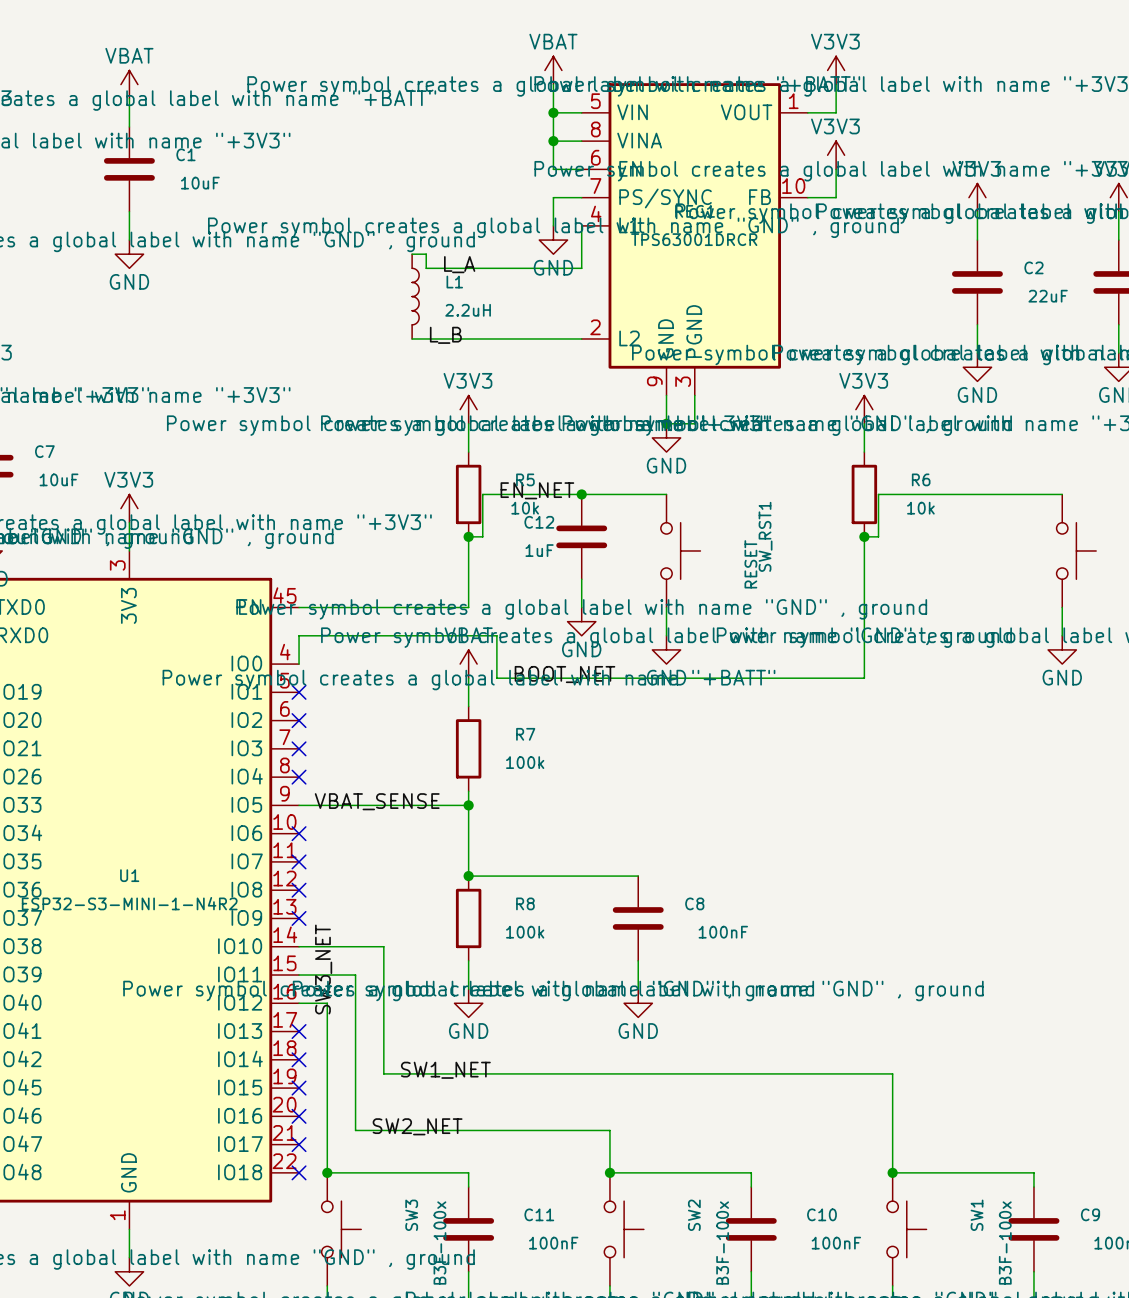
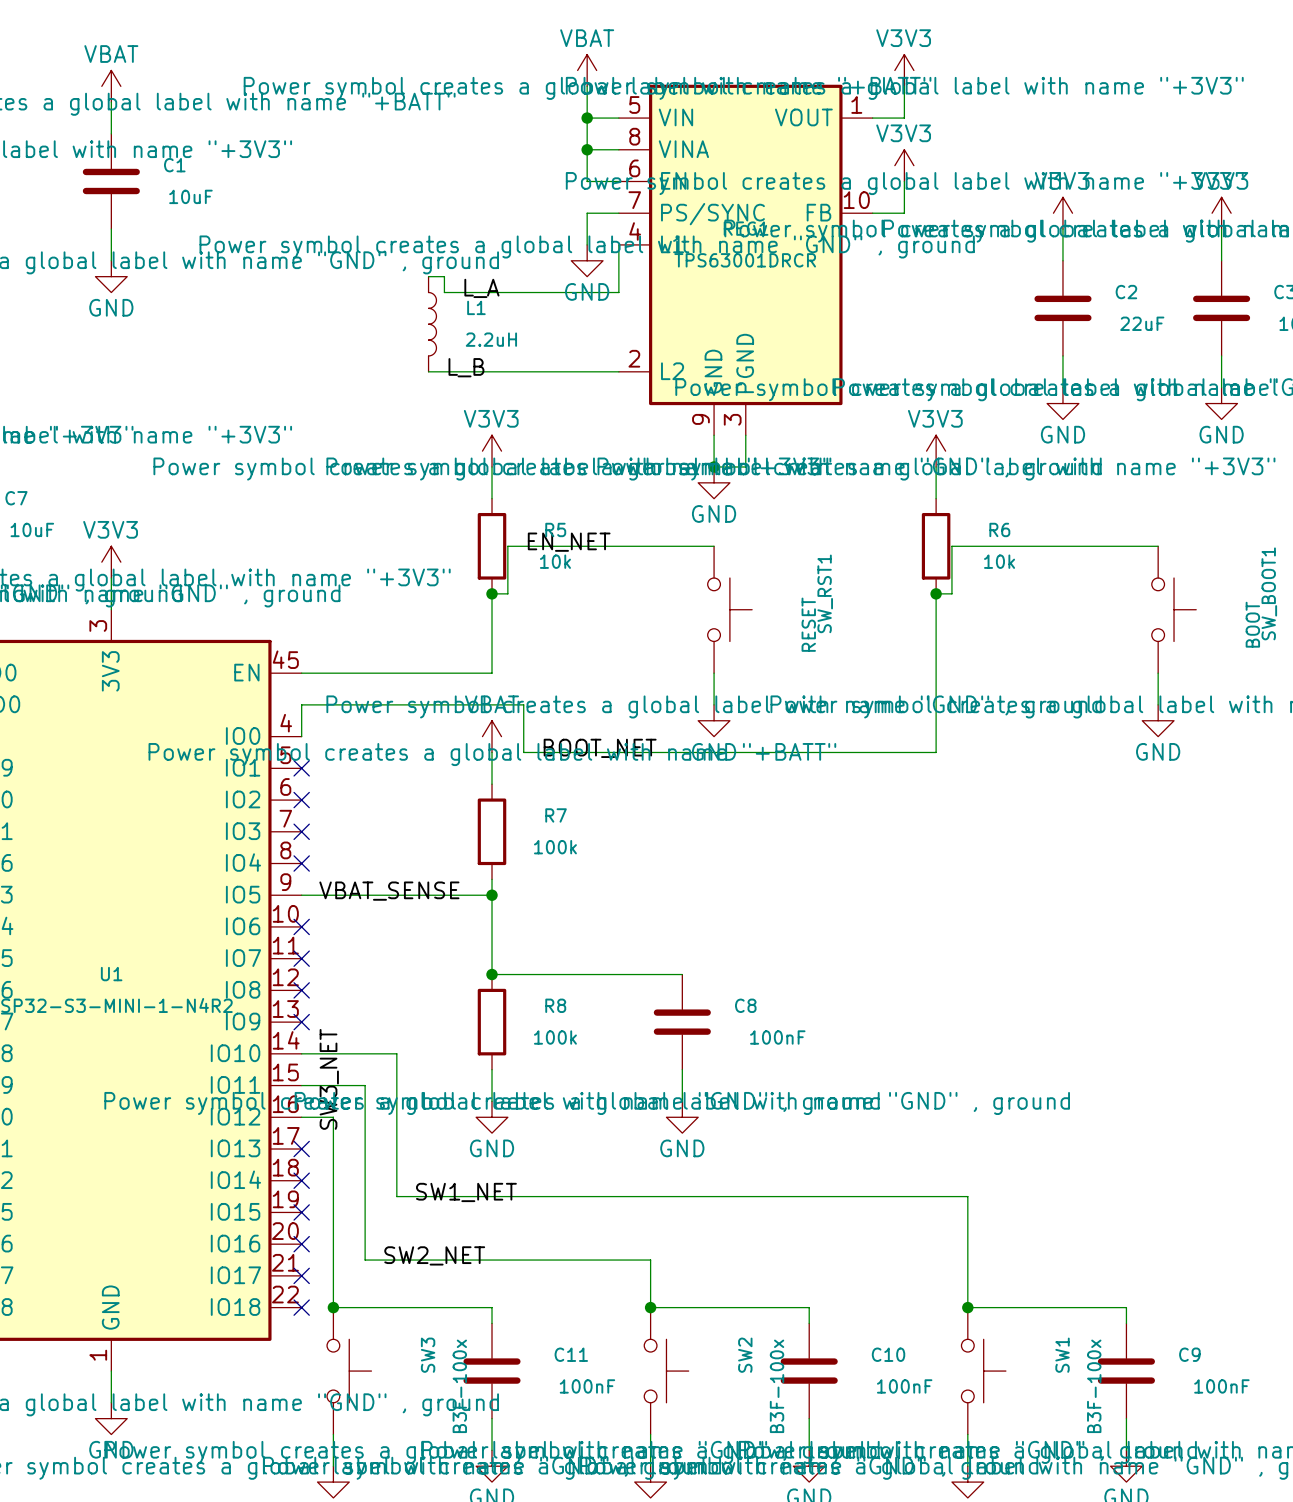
junction: (581, 494) -> none
C12: 1uF (581, 536) -> none
wire: (581, 579) (581, 607) -> none
power symbol: GND (581, 621) -> none

